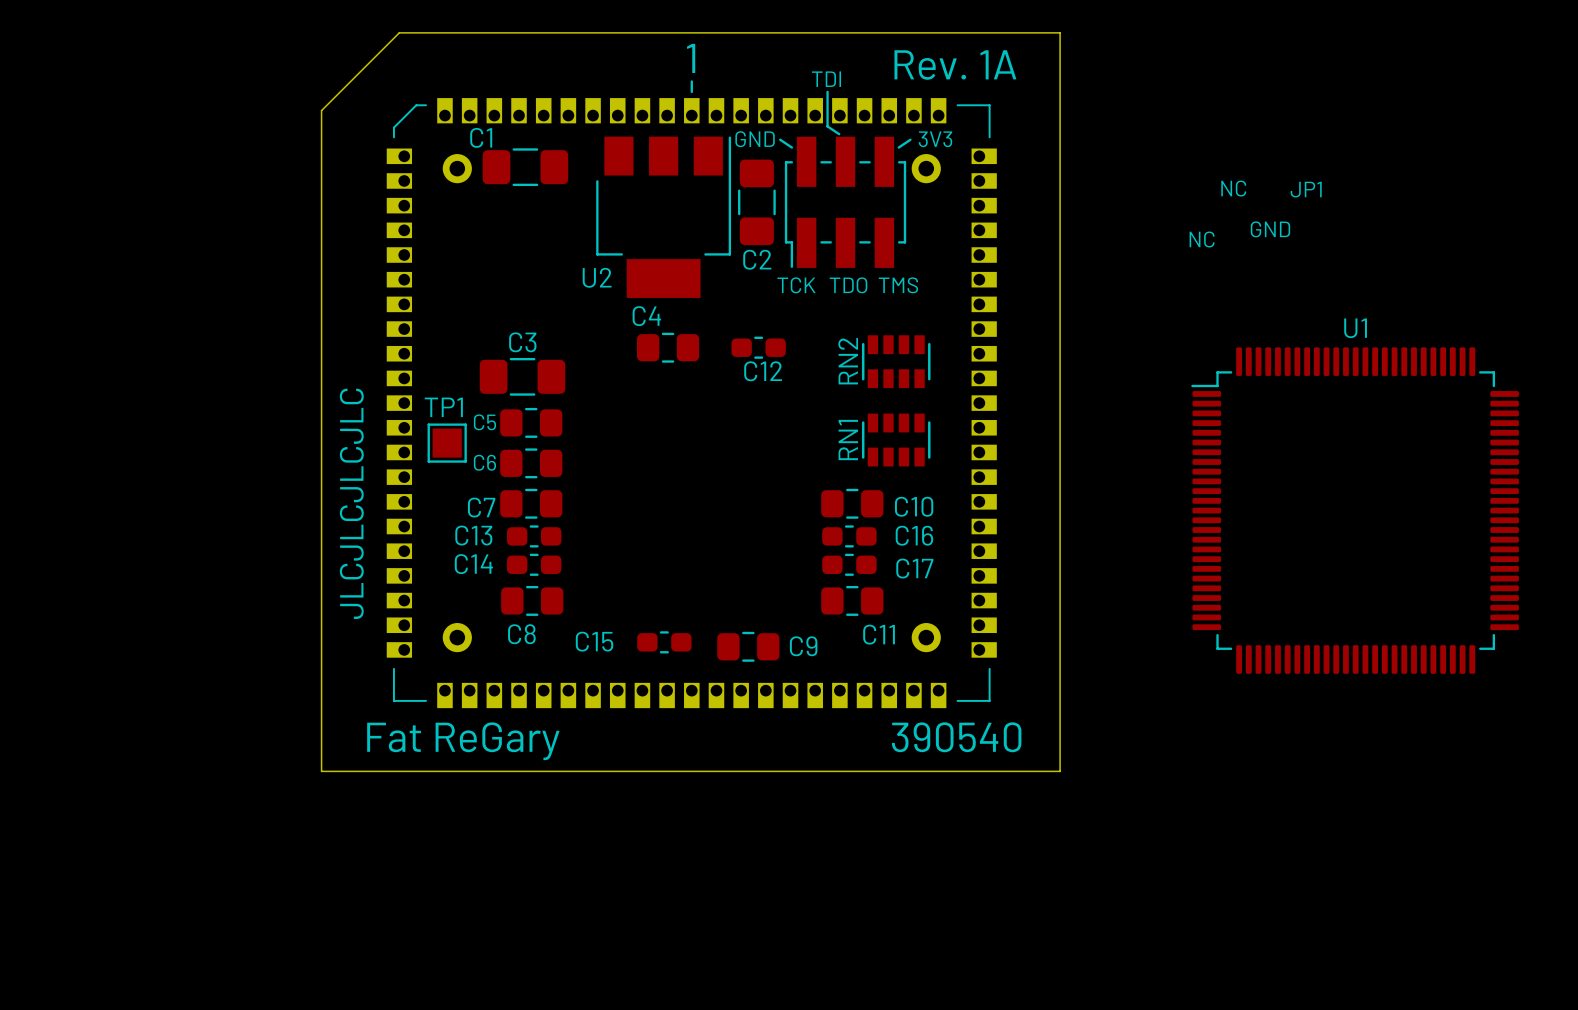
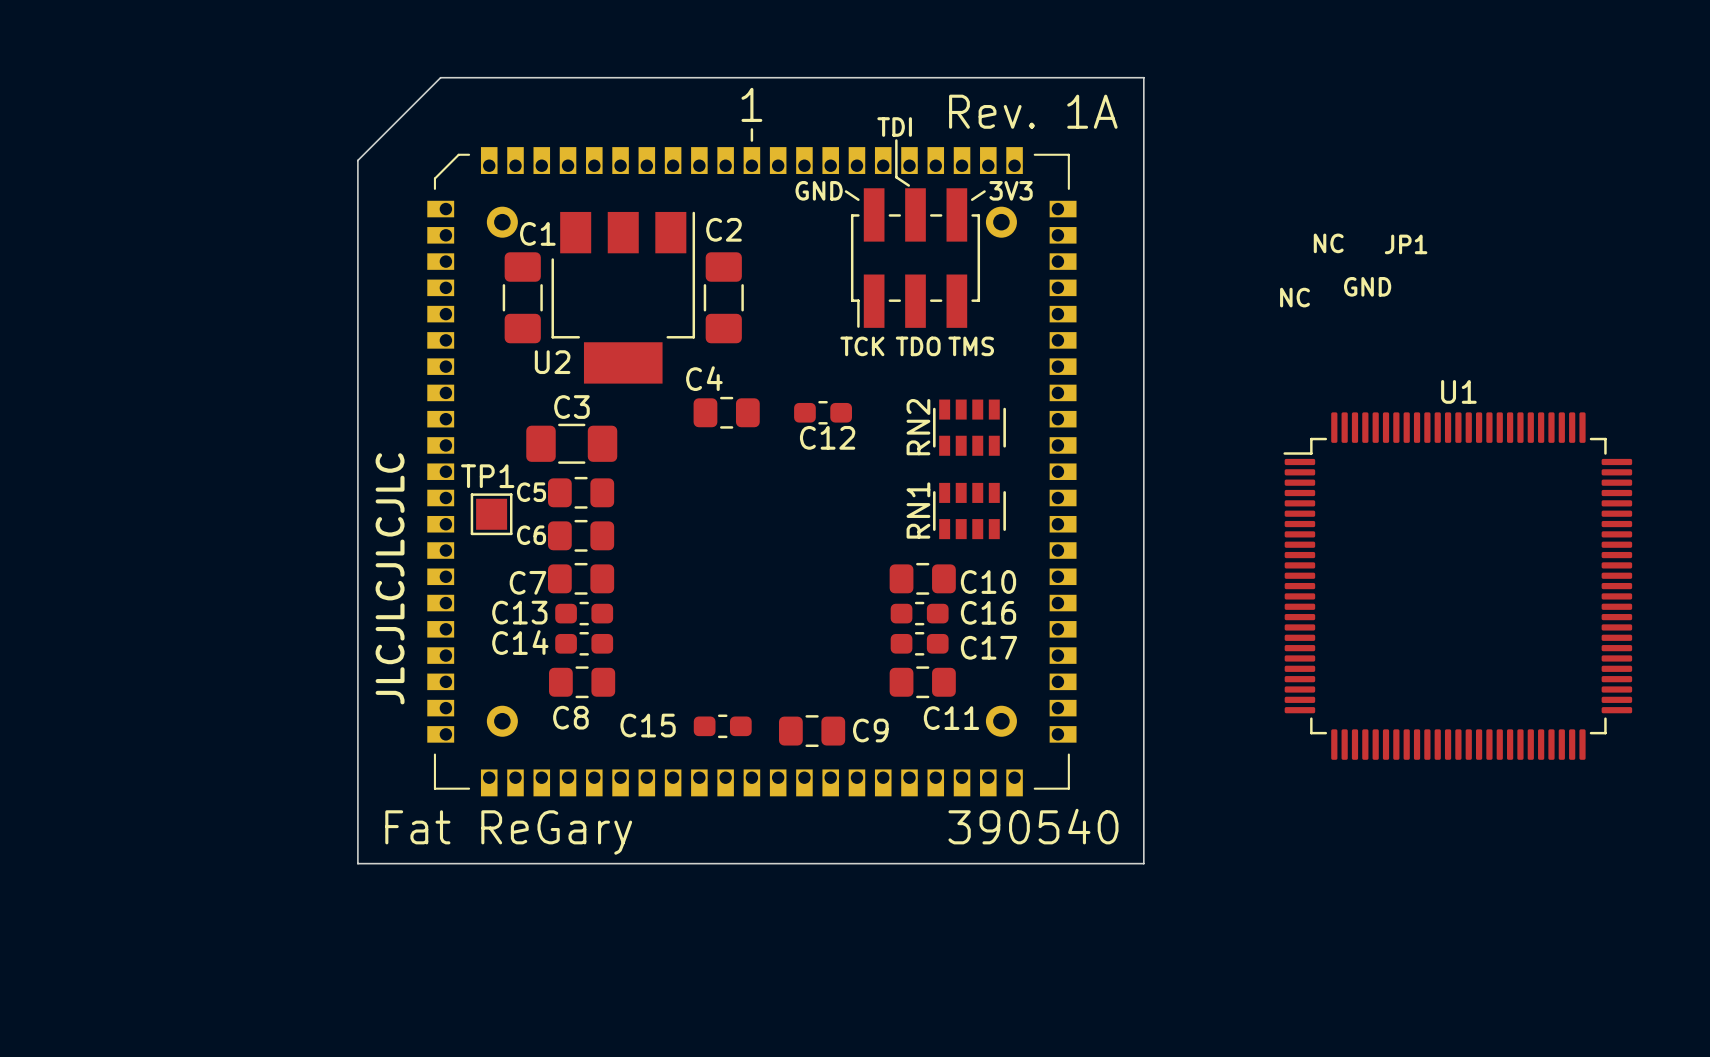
C1 rotation: 0° (525, 167) -> 90° clockwise (522, 297)
C1 position: (525, 167) -> (522, 297)
C2 position: (756, 202) -> (723, 297)
U2 position: (663, 217) -> (623, 297)
C2 name position: C2 (757, 259) -> C2 (723, 229)

